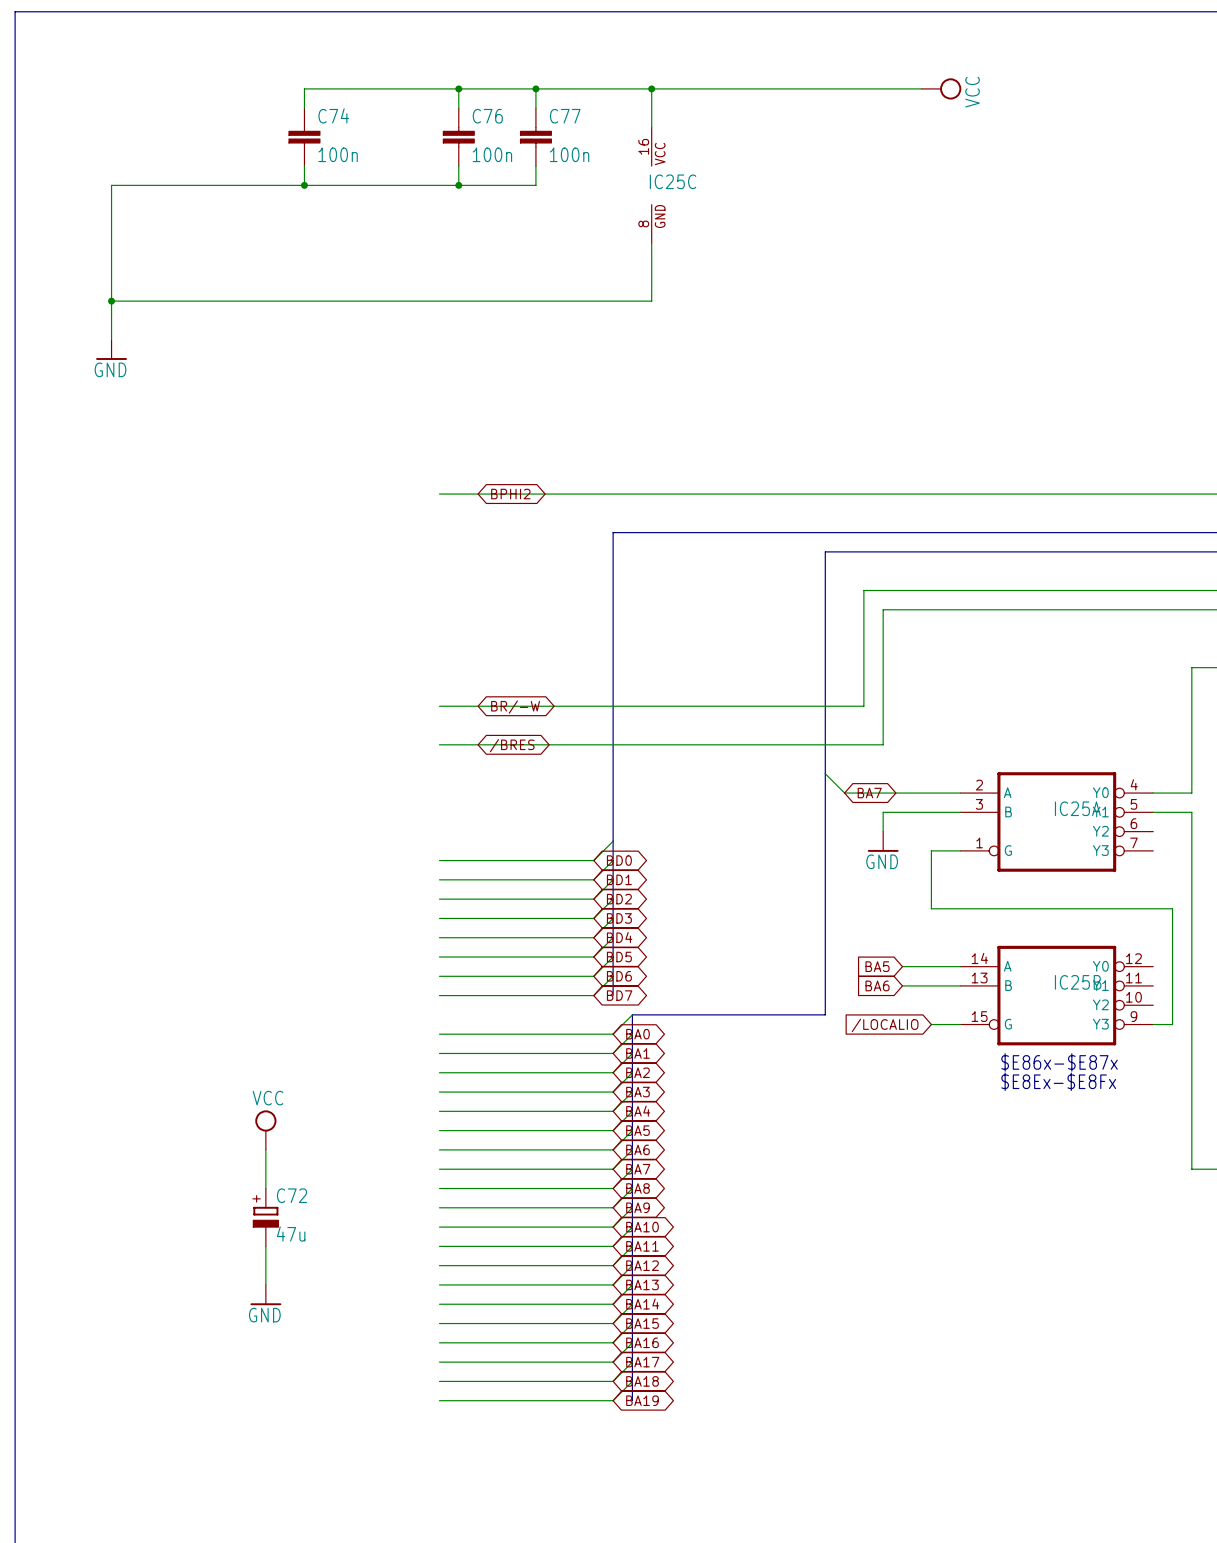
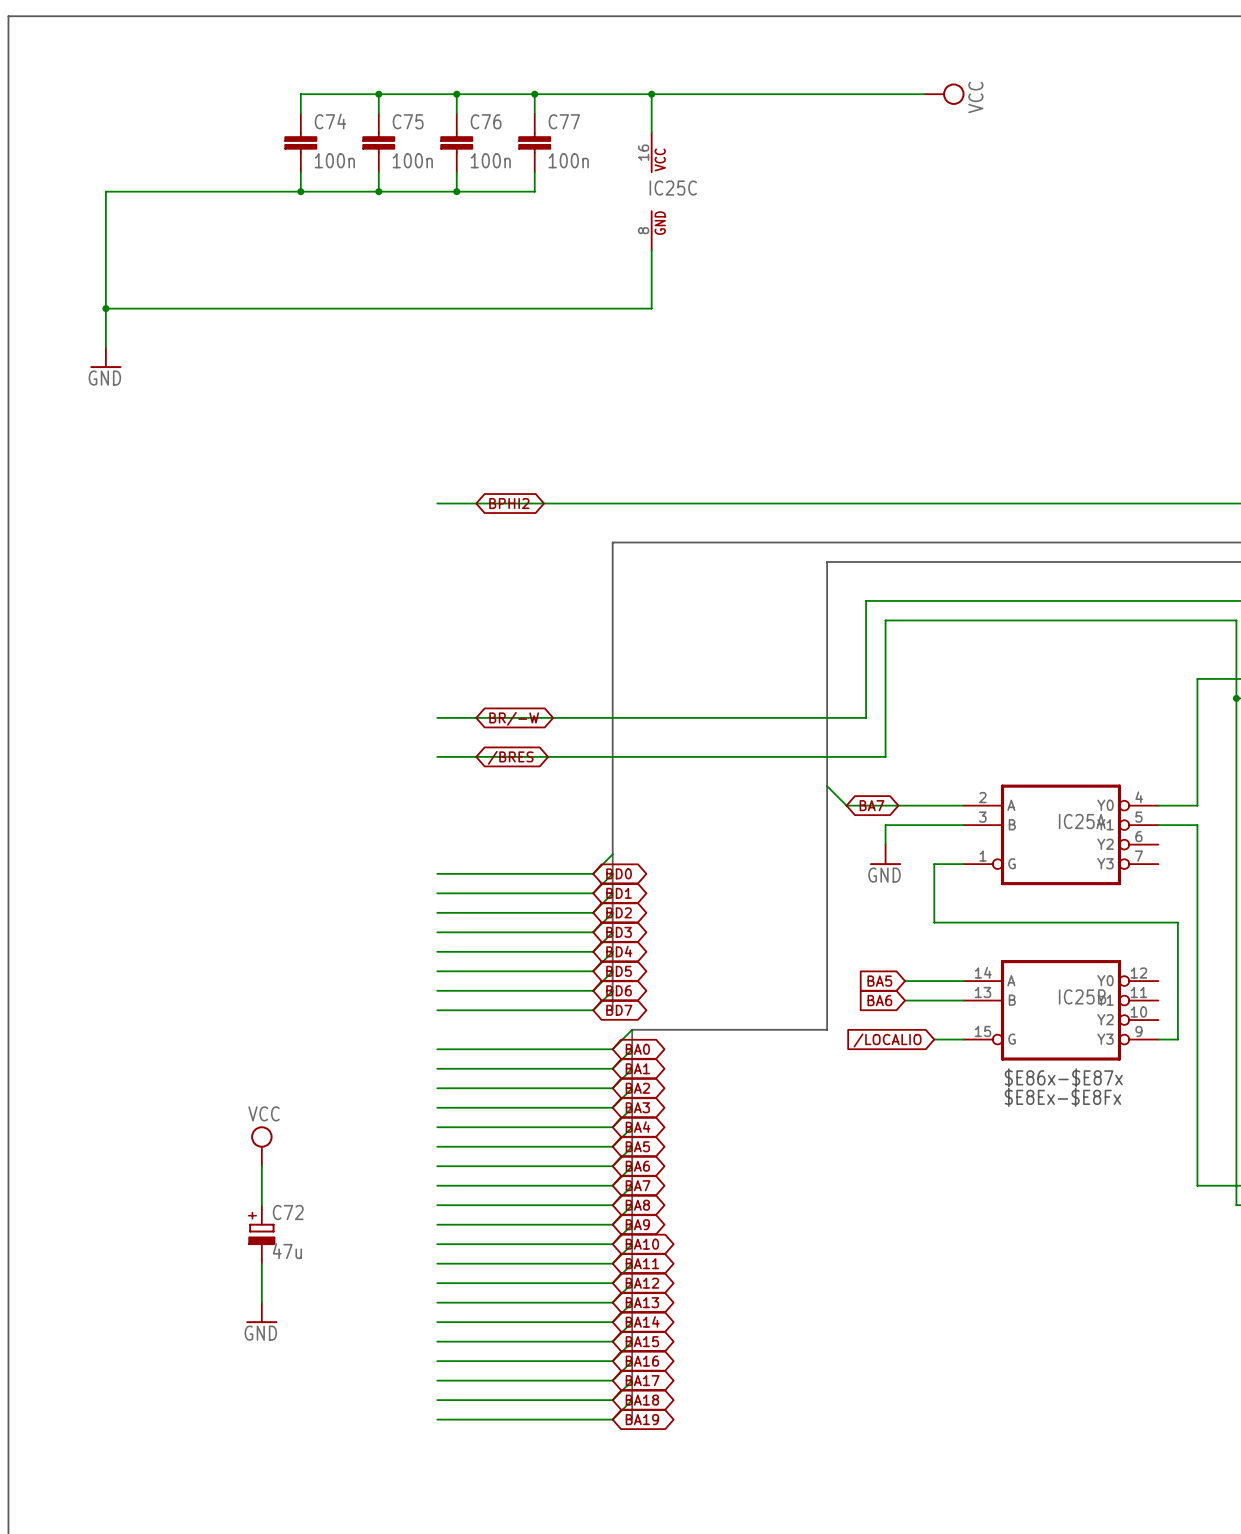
wire: none -> (378, 94) (378, 113)
junction: none -> (378, 94)
C75: none -> 100n (378, 142)
wire: none -> (378, 172) (378, 191)
junction: none -> (378, 191)

